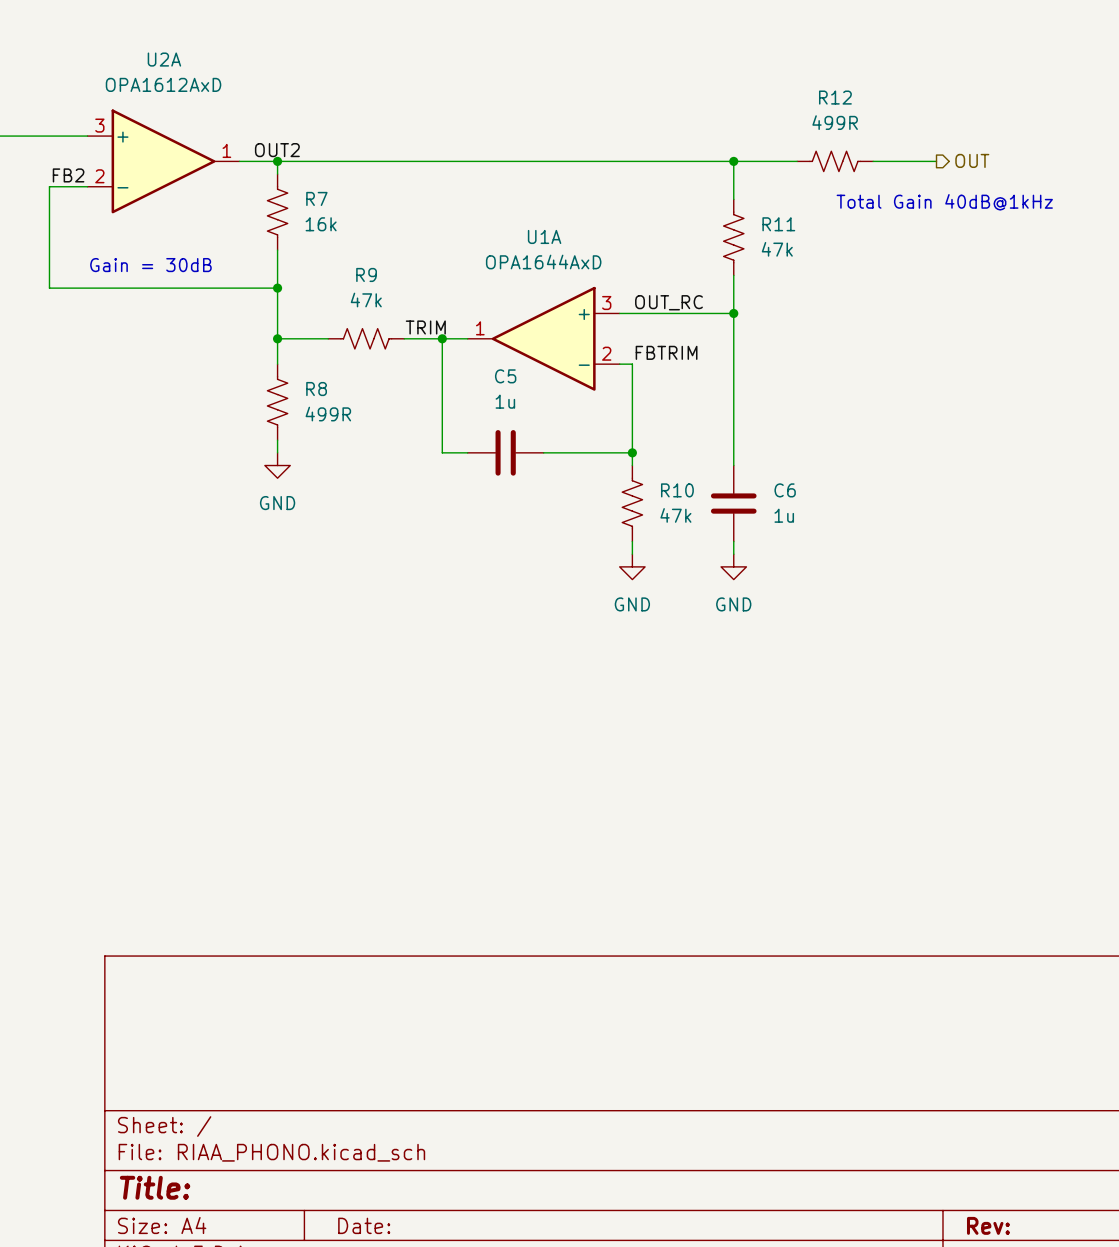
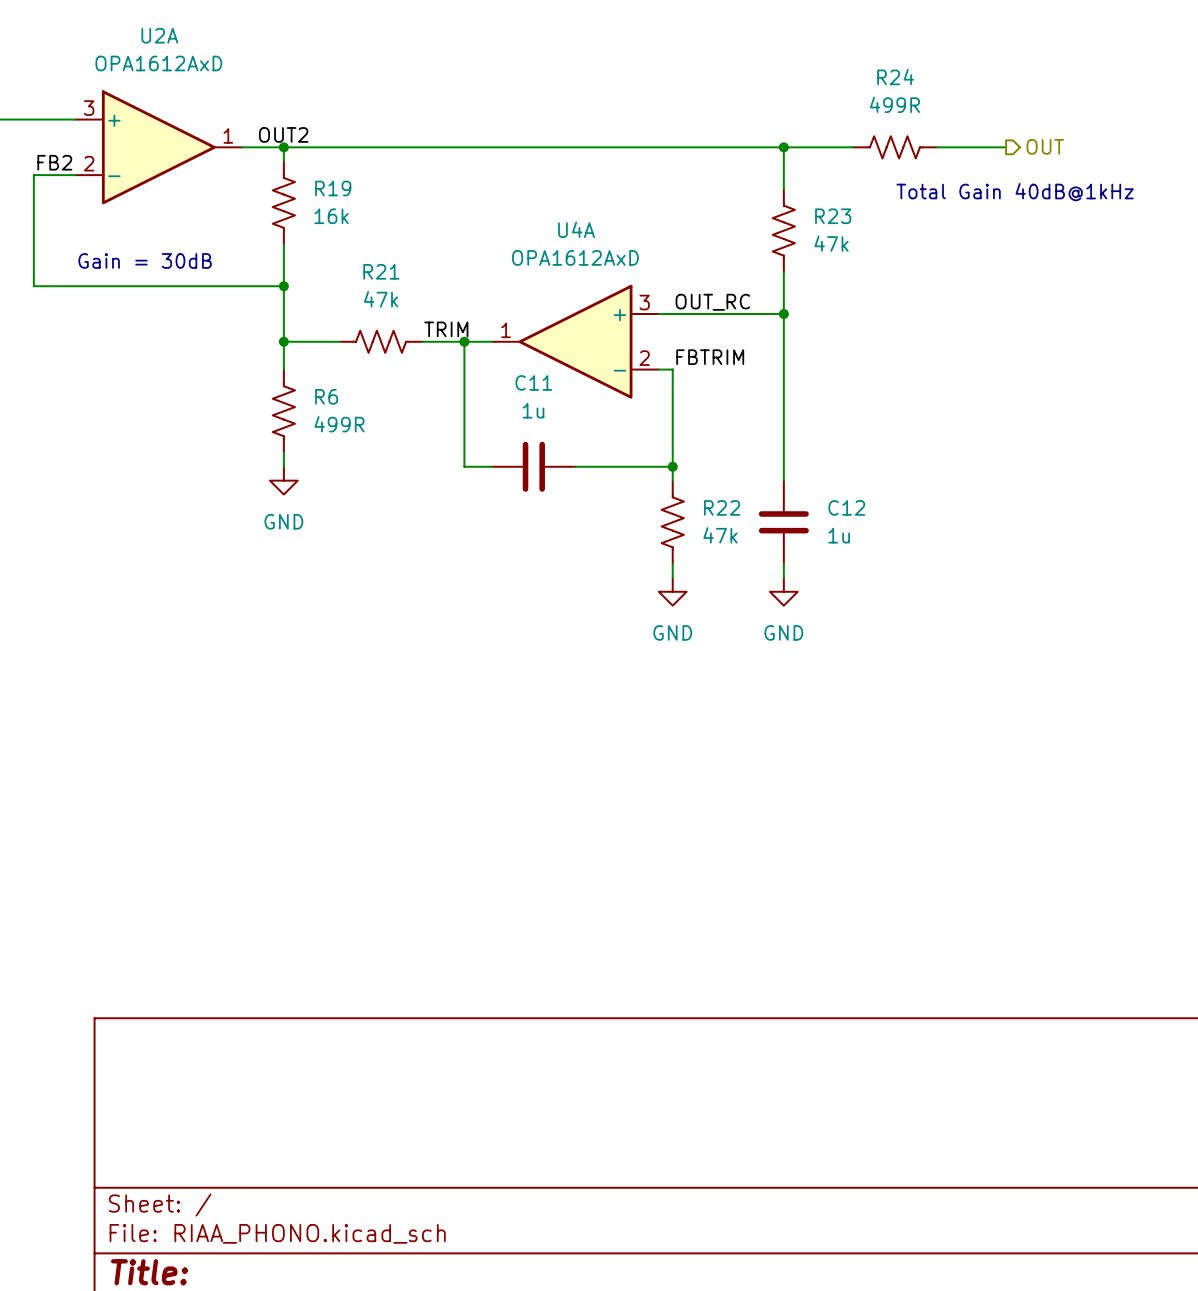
R12 name: R12 (835, 97) -> R24 (895, 77)
R7 name: R7 (316, 198) -> R19 (333, 188)
R11 name: R11 (778, 224) -> R23 (833, 216)
U1A name: U1A (544, 236) -> U4A (576, 229)
U1A value: OPA1644AxD (543, 262) -> OPA1612AxD (575, 257)
R9 name: R9 (366, 274) -> R21 (381, 271)
C5 name: C5 (505, 376) -> C11 (533, 382)
R8 name: R8 (316, 389) -> R6 (326, 396)
R10 name: R10 (677, 490) -> R22 (722, 507)
C6 name: C6 (785, 490) -> C12 (846, 507)

